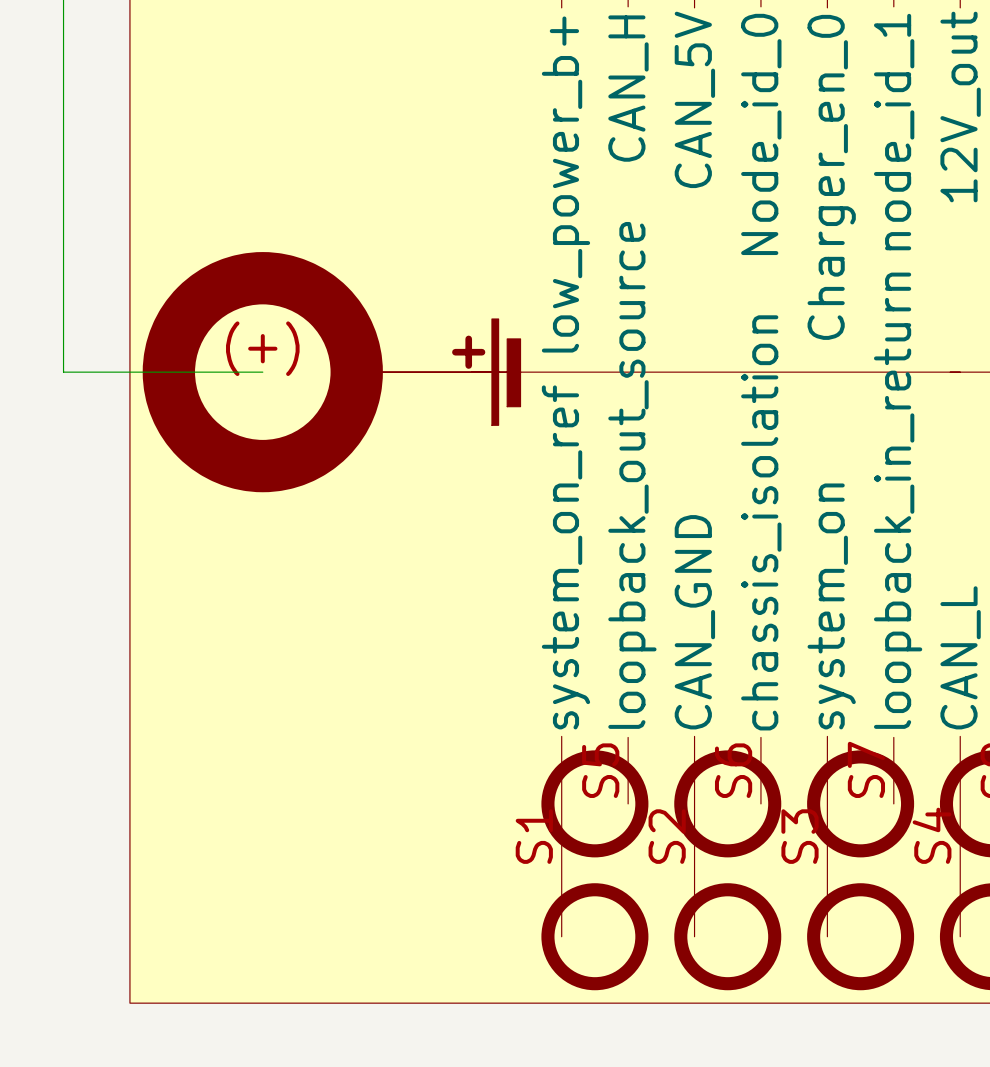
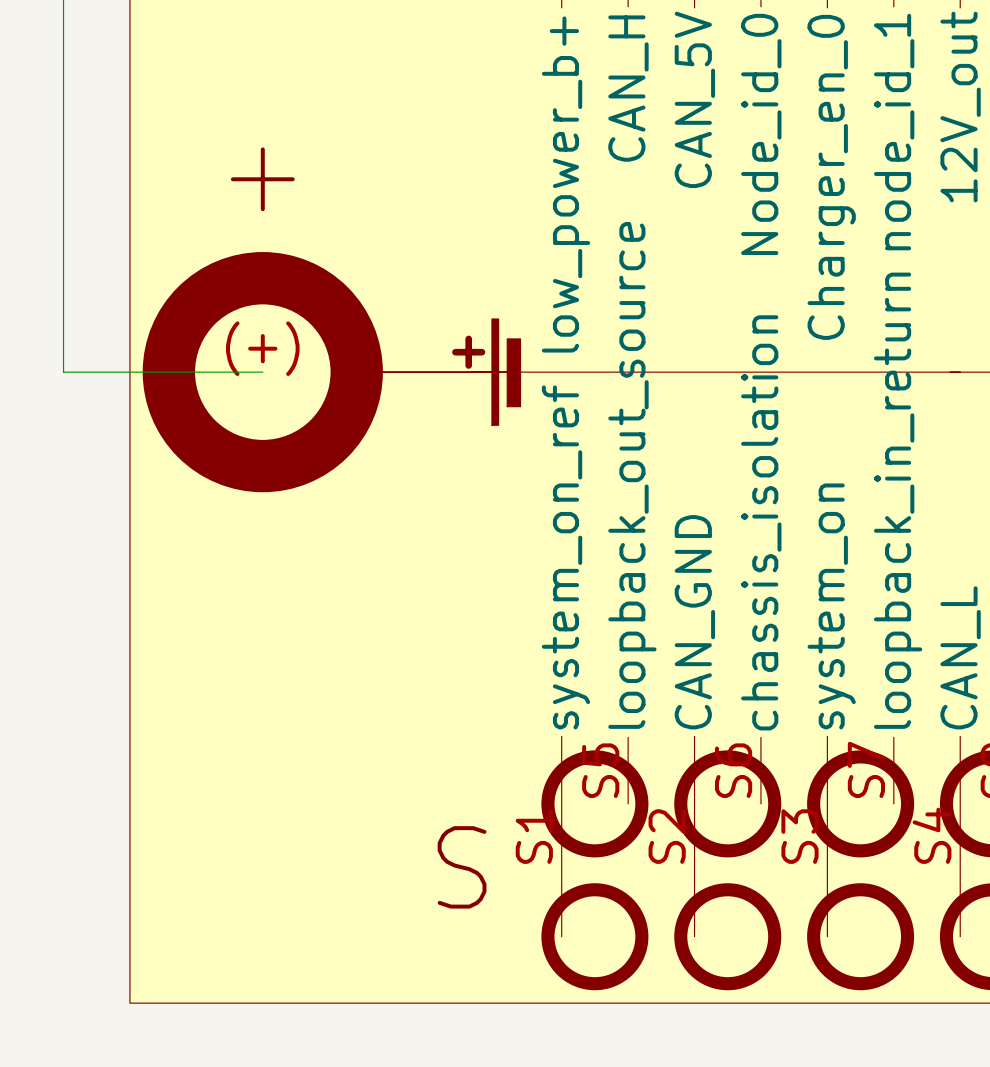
part text: none -> + (262, 179)
part text: none -> S (462, 867)

